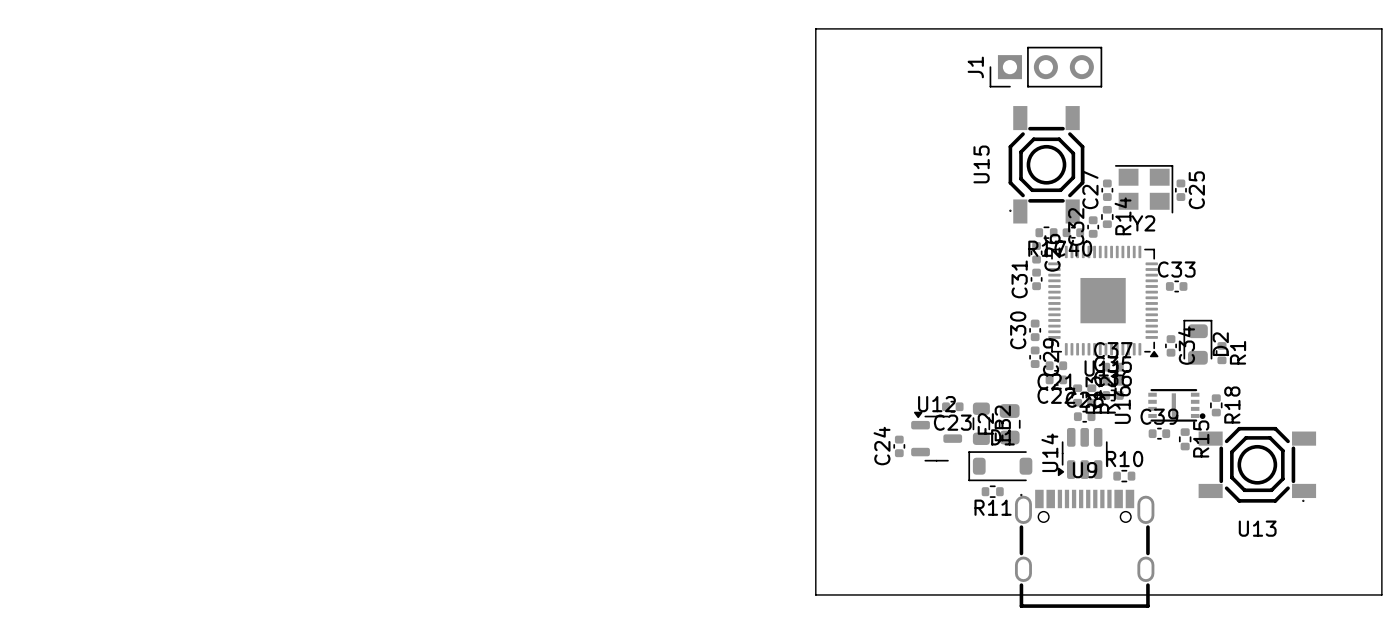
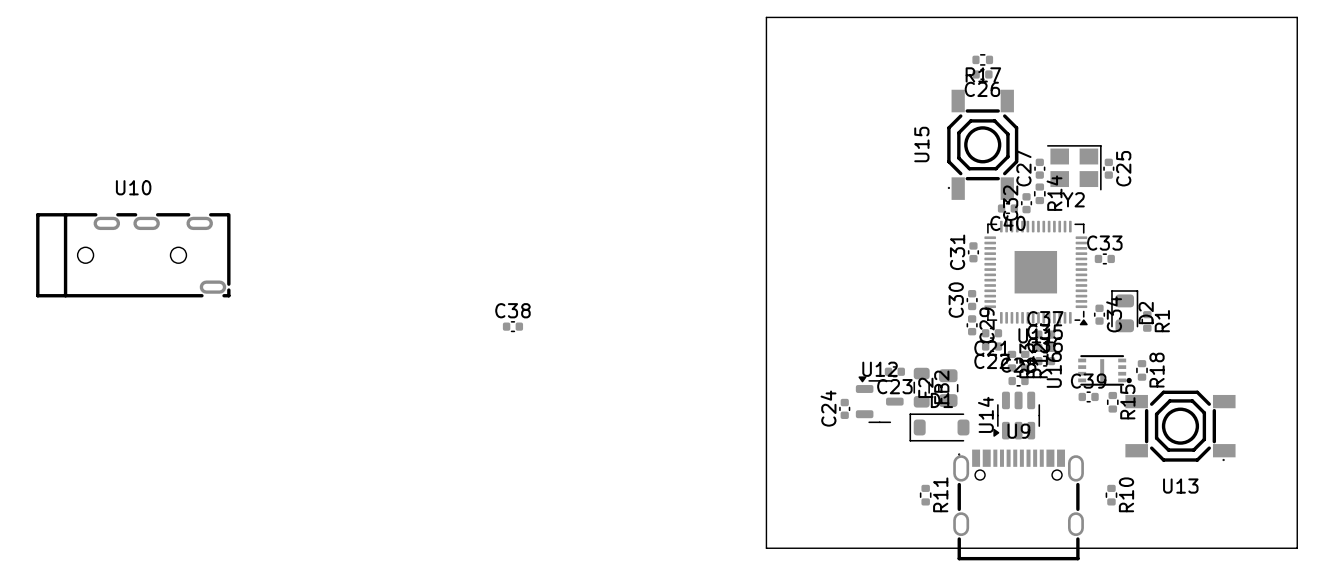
J1: (1045, 67) -> none
R17 position: (1046, 232) -> (982, 59)
C26 rotation: 0° (1036, 252) -> 90° clockwise (982, 74)
C26 position: (1036, 252) -> (982, 74)
U10: none -> (133, 255)
C38: none -> (512, 326)
R10 rotation: 0° (1124, 476) -> 90° clockwise (1111, 495)
R10 position: (1124, 476) -> (1111, 495)
R11 rotation: 0° (992, 491) -> 90° clockwise (925, 495)
R11 position: (992, 491) -> (925, 495)

